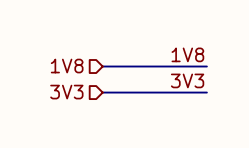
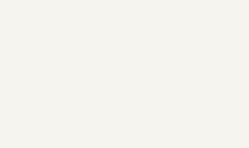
label: 1V8 (187, 54) -> none
hierarchical label: 1V8 (67, 66) -> none
wire: (102, 66) (206, 66) -> none
label: 3V3 (187, 80) -> none
hierarchical label: 3V3 (66, 92) -> none
wire: (102, 92) (206, 92) -> none

